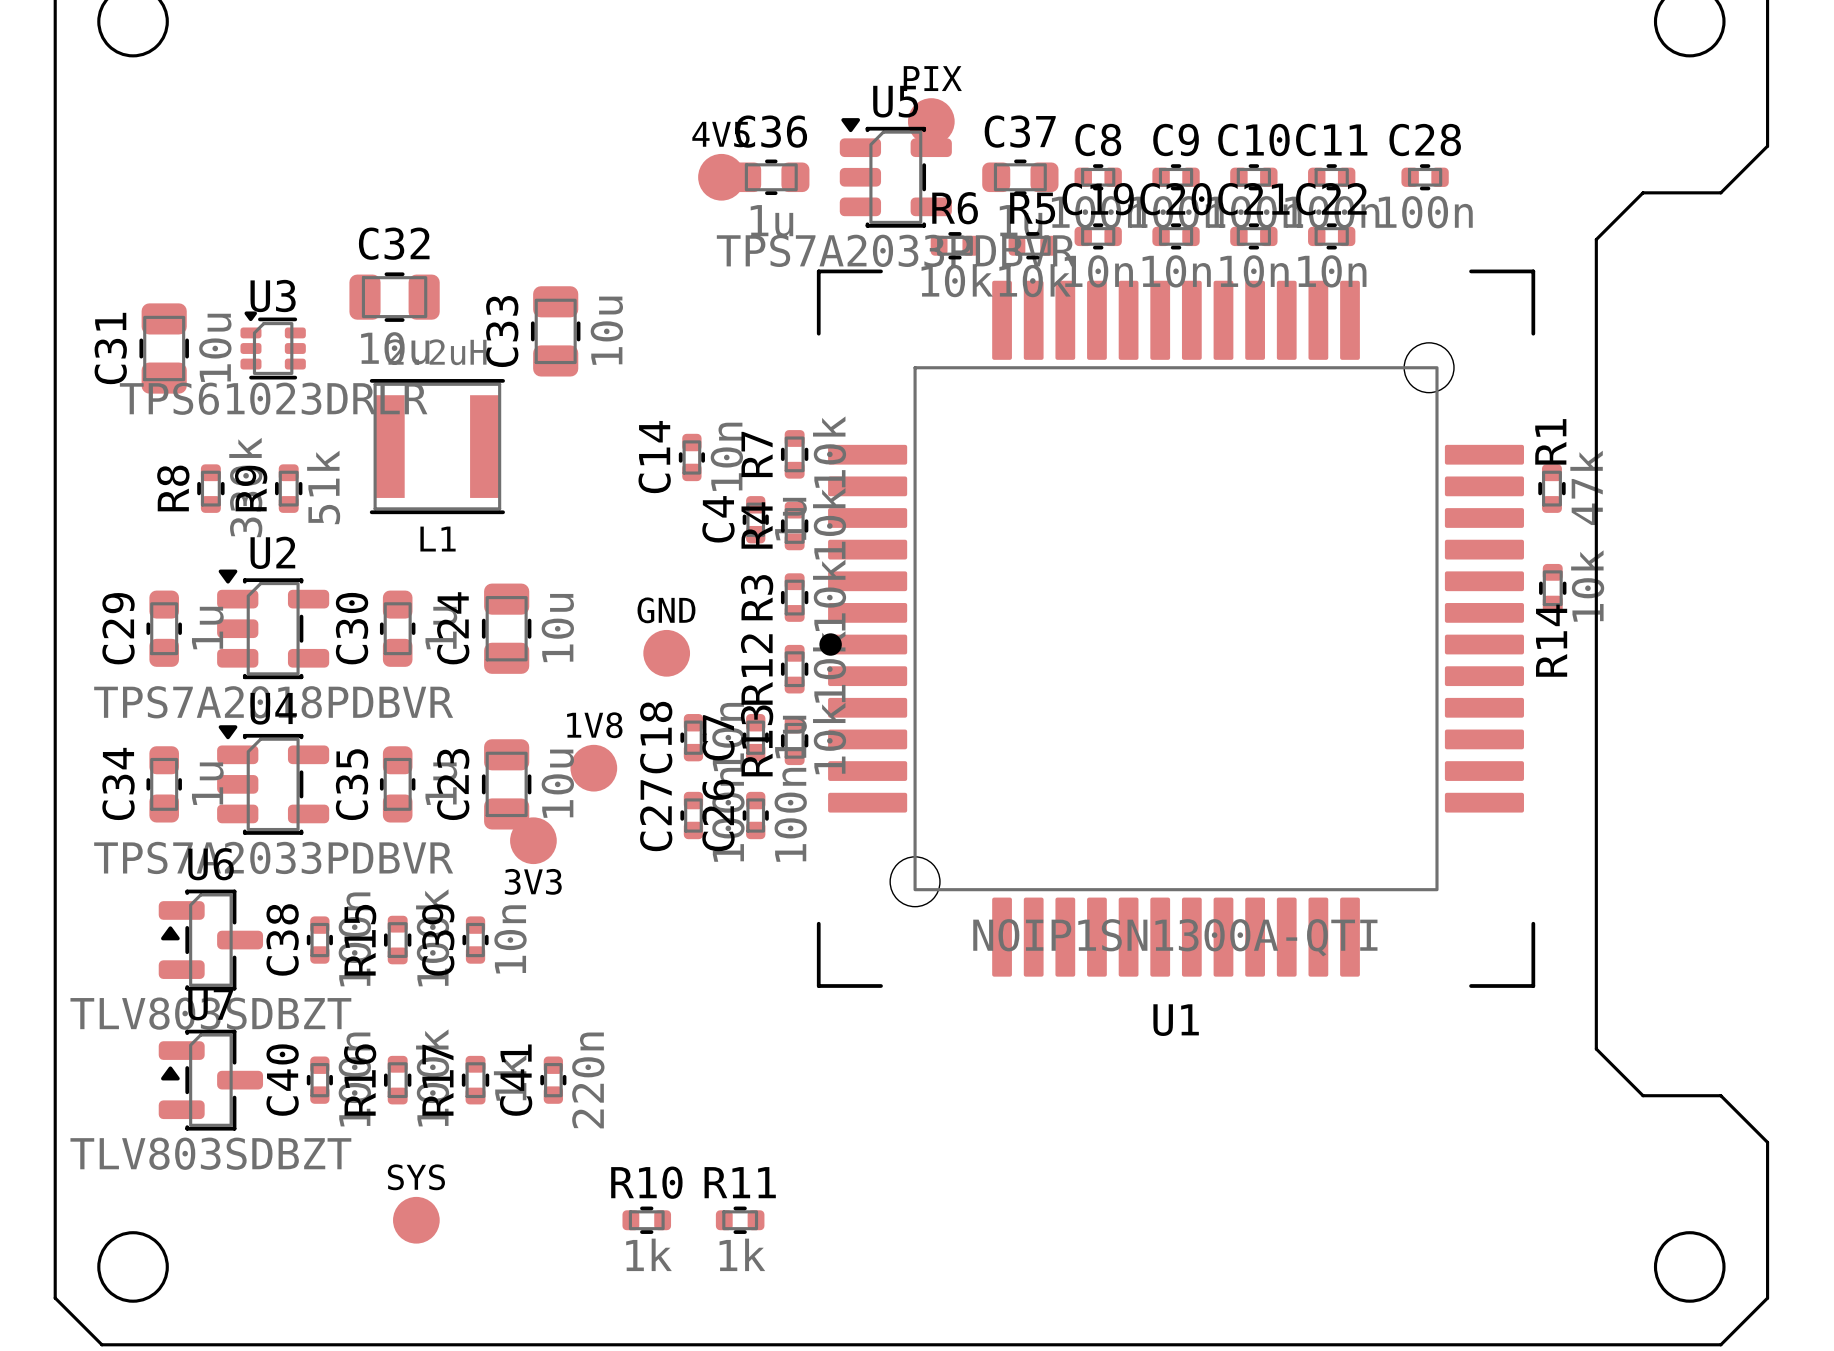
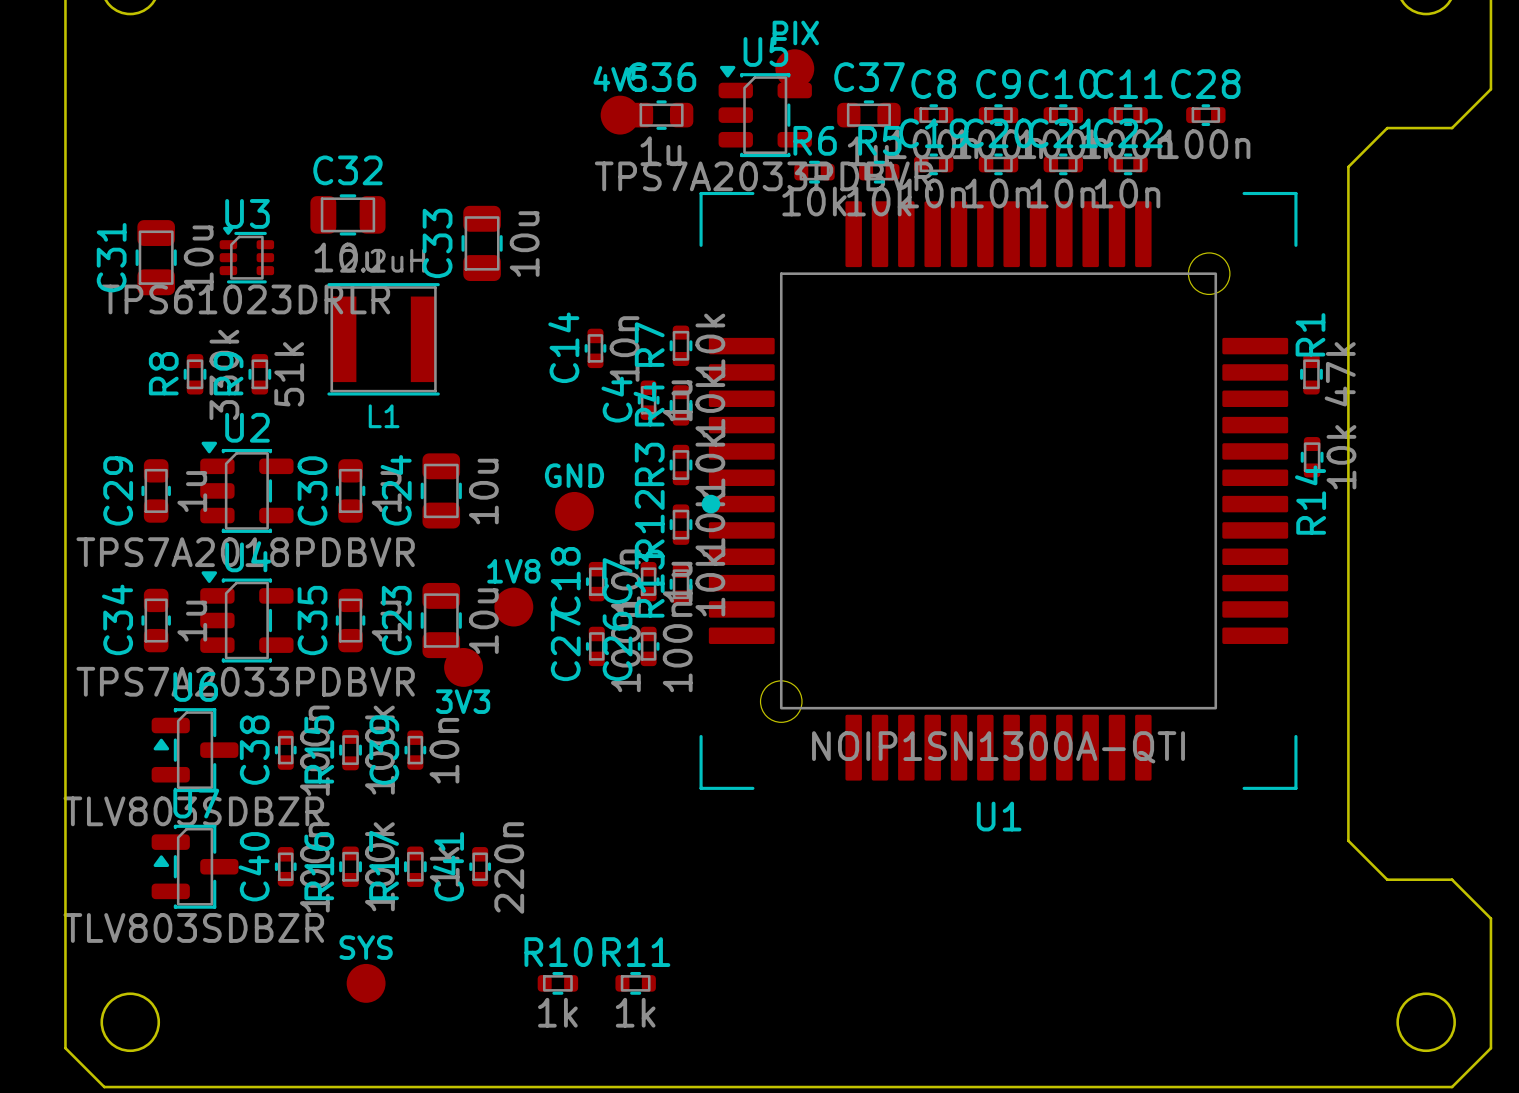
U6 value: TLV803SDBZT (210, 1013) -> TLV803SDBZR (193, 811)
U7 value: TLV803SDBZT (210, 1153) -> TLV803SDBZR (193, 927)

